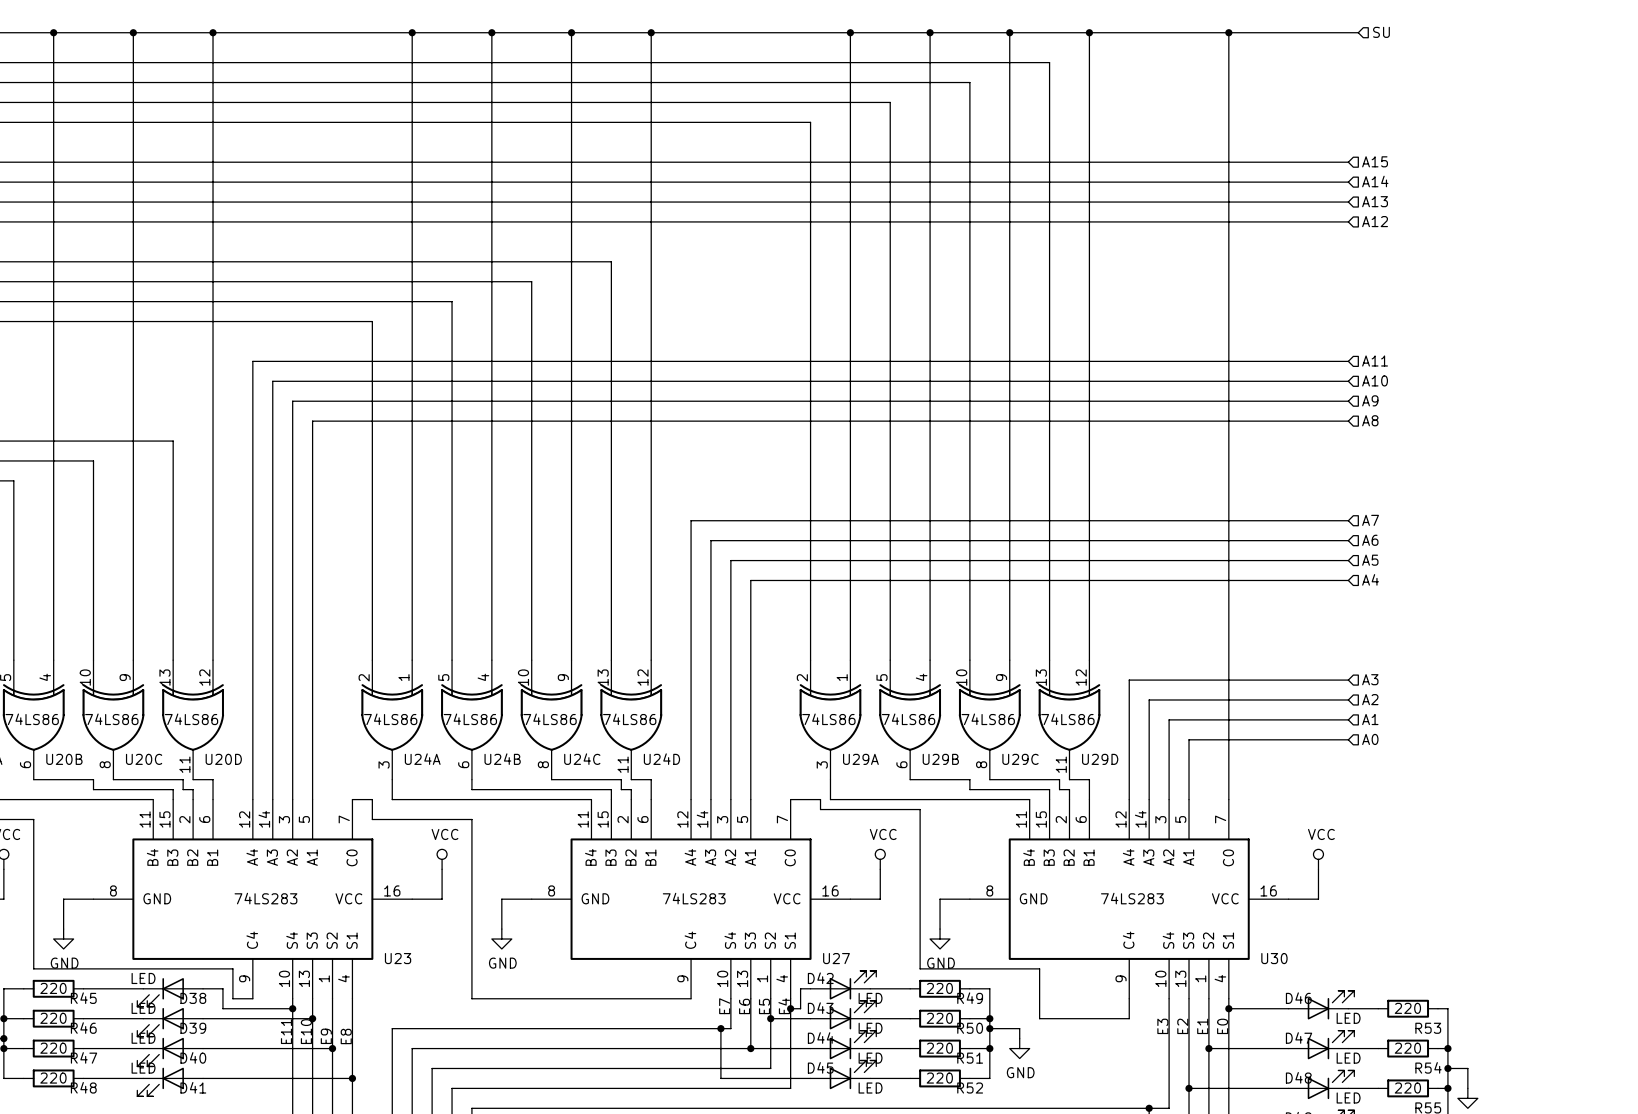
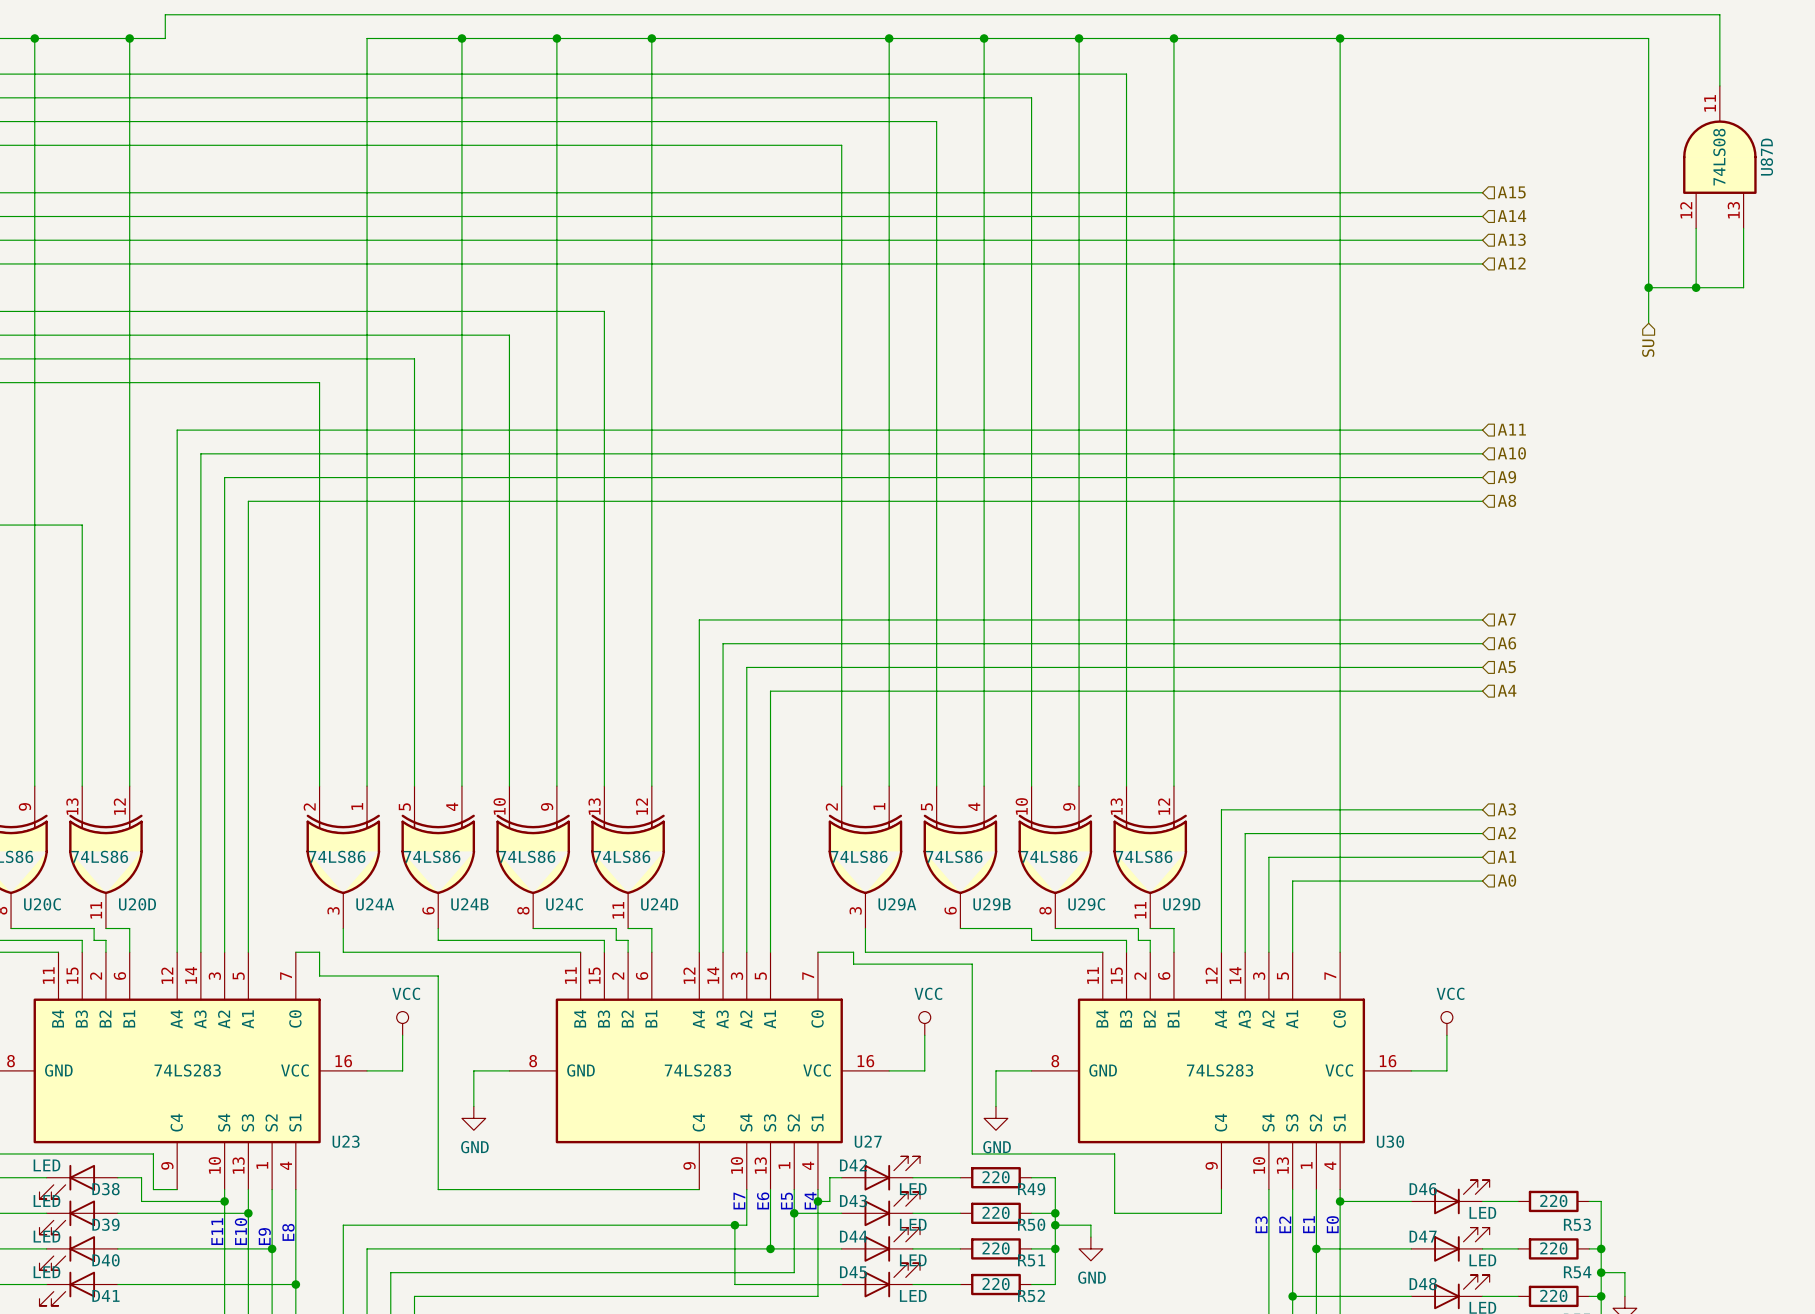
wire: (242, 32) (412, 32) -> (165, 38) (165, 14) (1719, 14) (1719, 85)
junction: (412, 32) -> none
wire: none -> (1494, 38) (1648, 38) (1648, 323)
hierarchical label: SU (1381, 32) -> none
U87D: none -> 74LS08 (1719, 157)
wire: none -> (1696, 228) (1696, 287)
wire: none -> (1743, 228) (1743, 287) (1648, 287)
junction: none -> (1648, 287)
junction: none -> (1696, 287)
hierarchical label: none -> SU (1648, 348)

